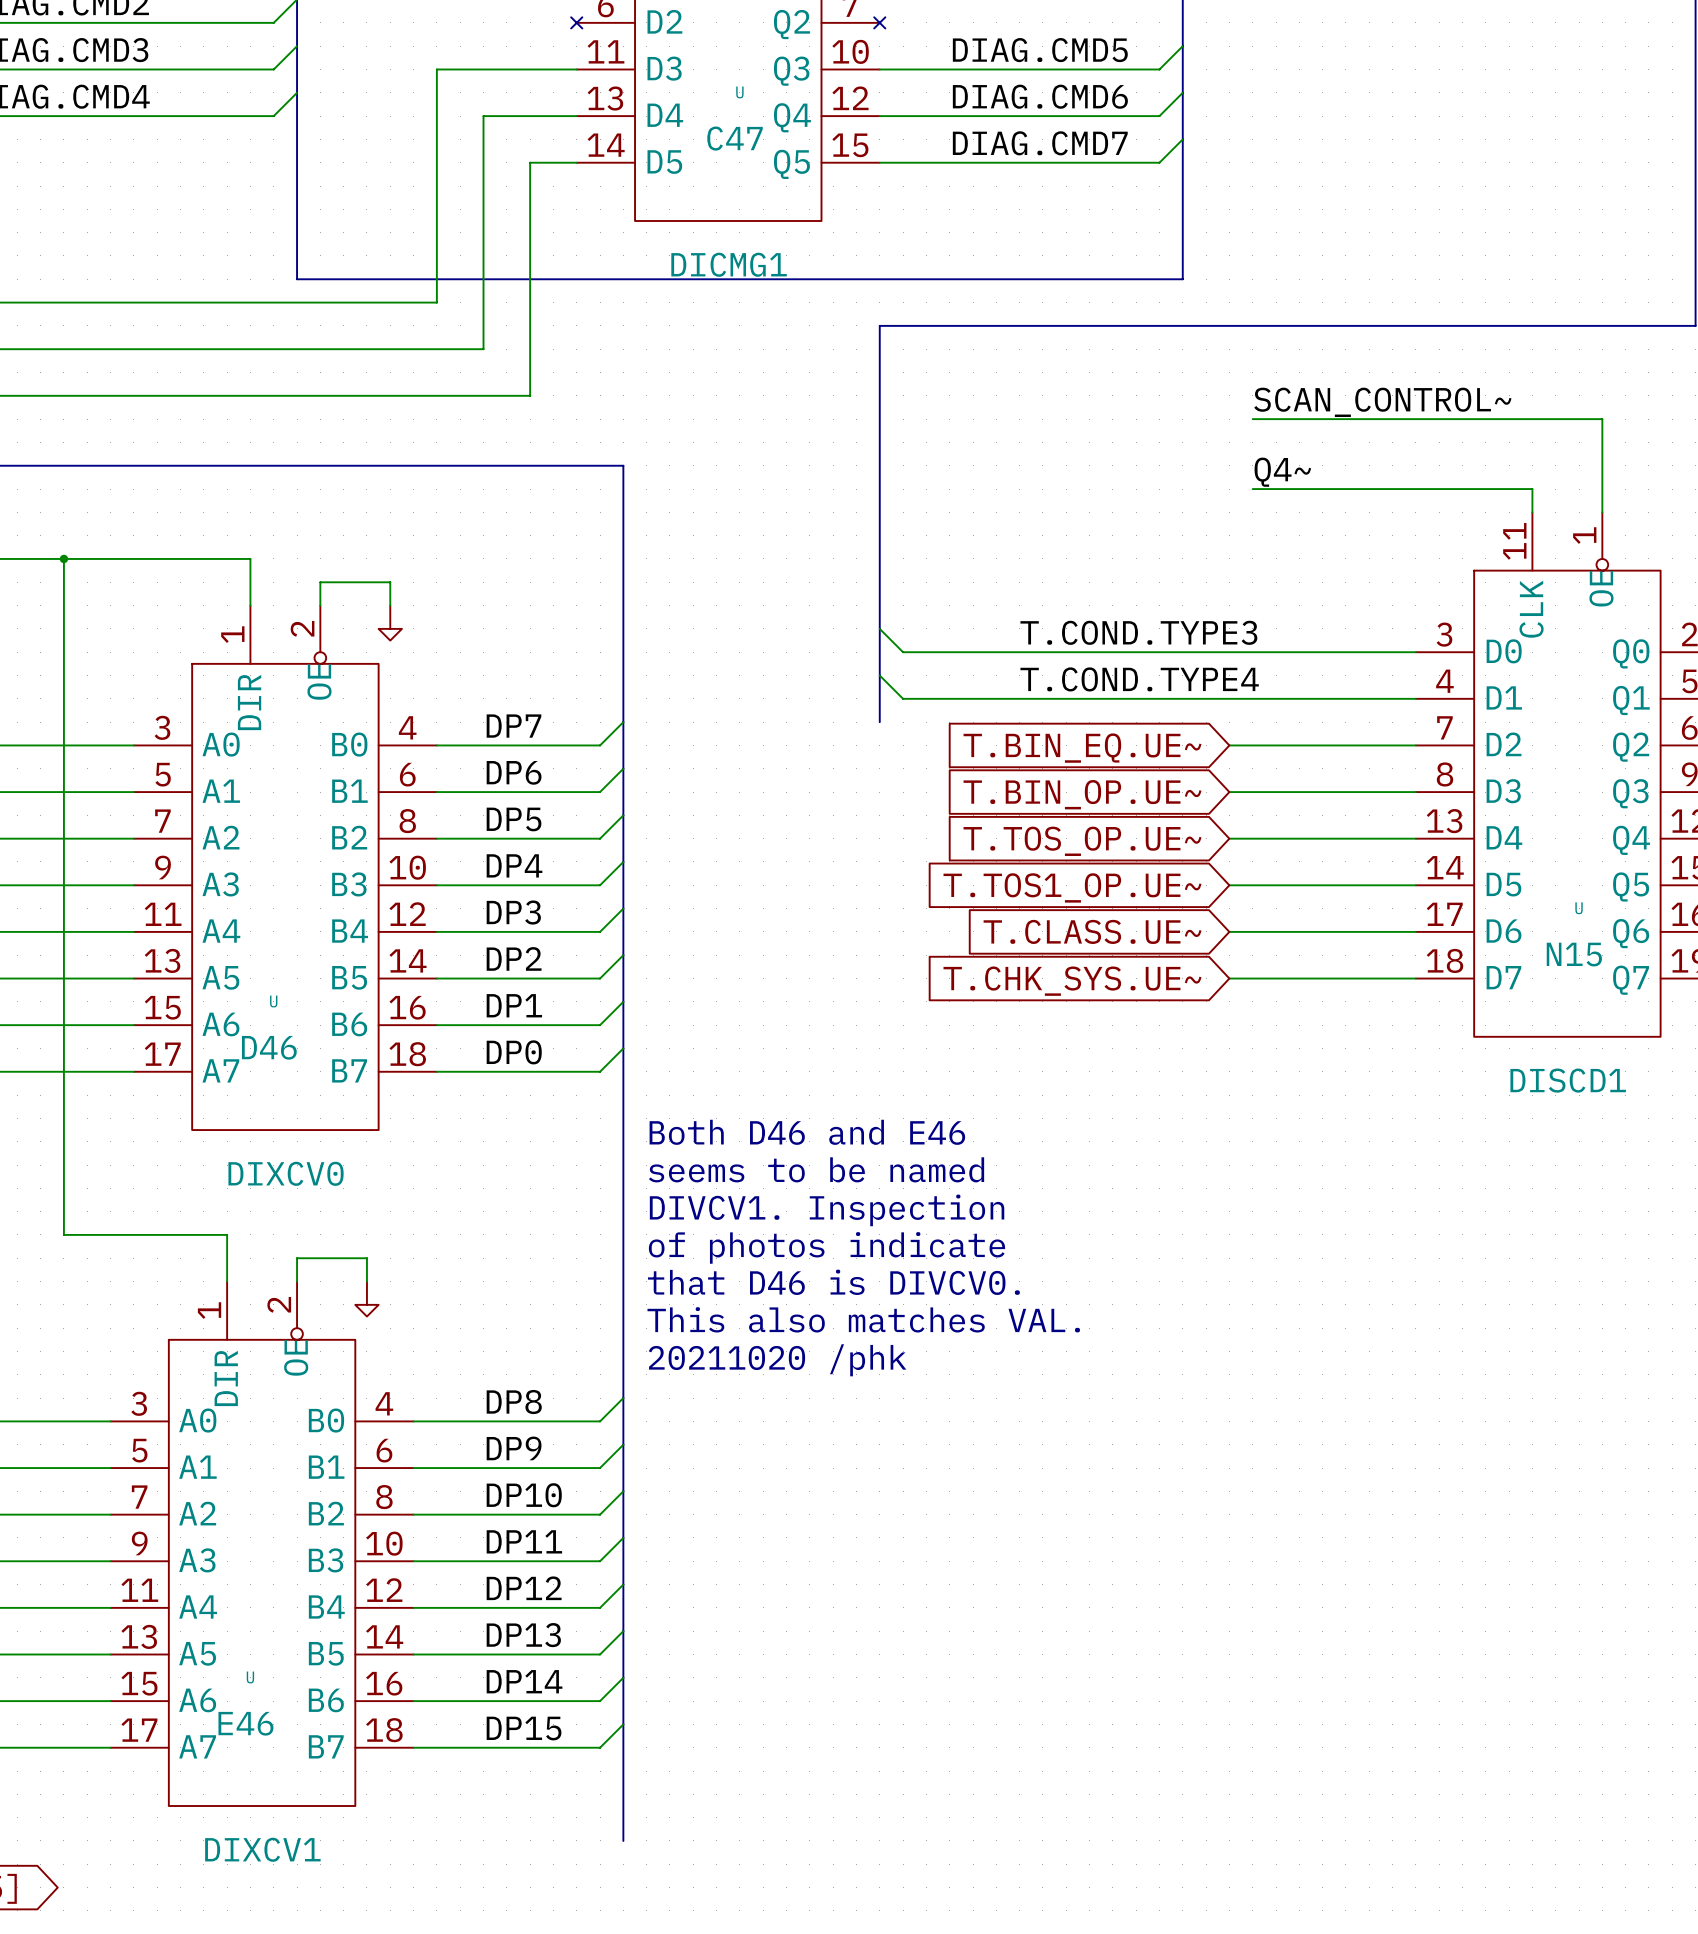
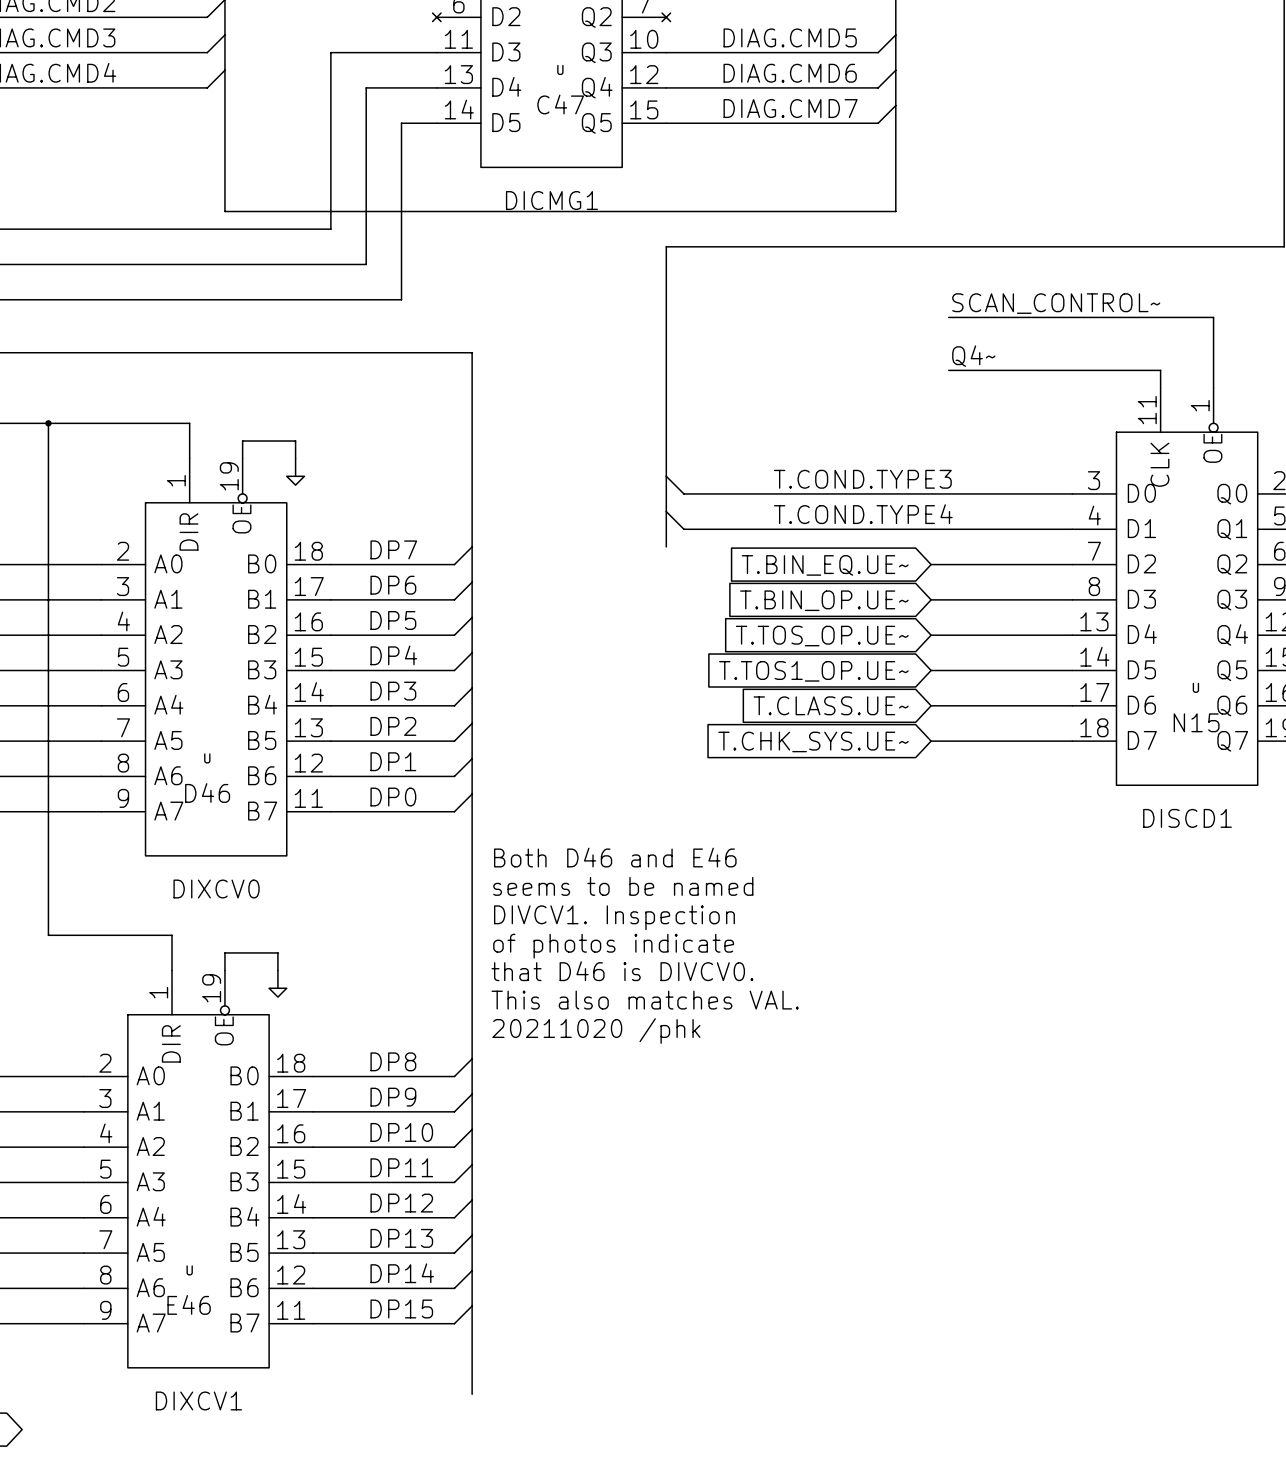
U symbol: [133, 605, 437, 1131] -> [101, 458, 331, 856]
U symbol: [110, 1281, 414, 1807] -> [83, 970, 314, 1368]

